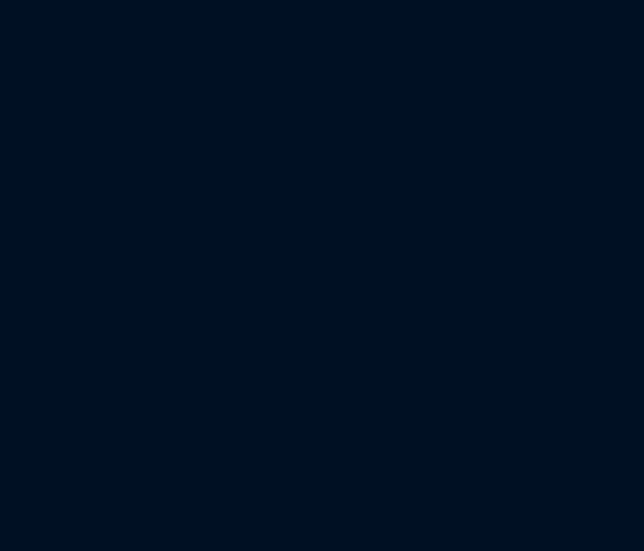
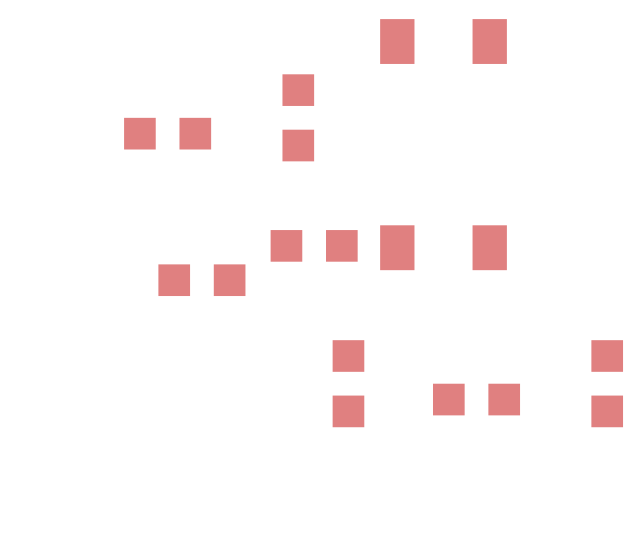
part: none -> (443, 41)
part: none -> (298, 117)
part: none -> (167, 133)
part: none -> (314, 245)
part: none -> (443, 247)
part: none -> (201, 280)
part: none -> (348, 383)
part: none -> (607, 383)
part: none -> (476, 399)

